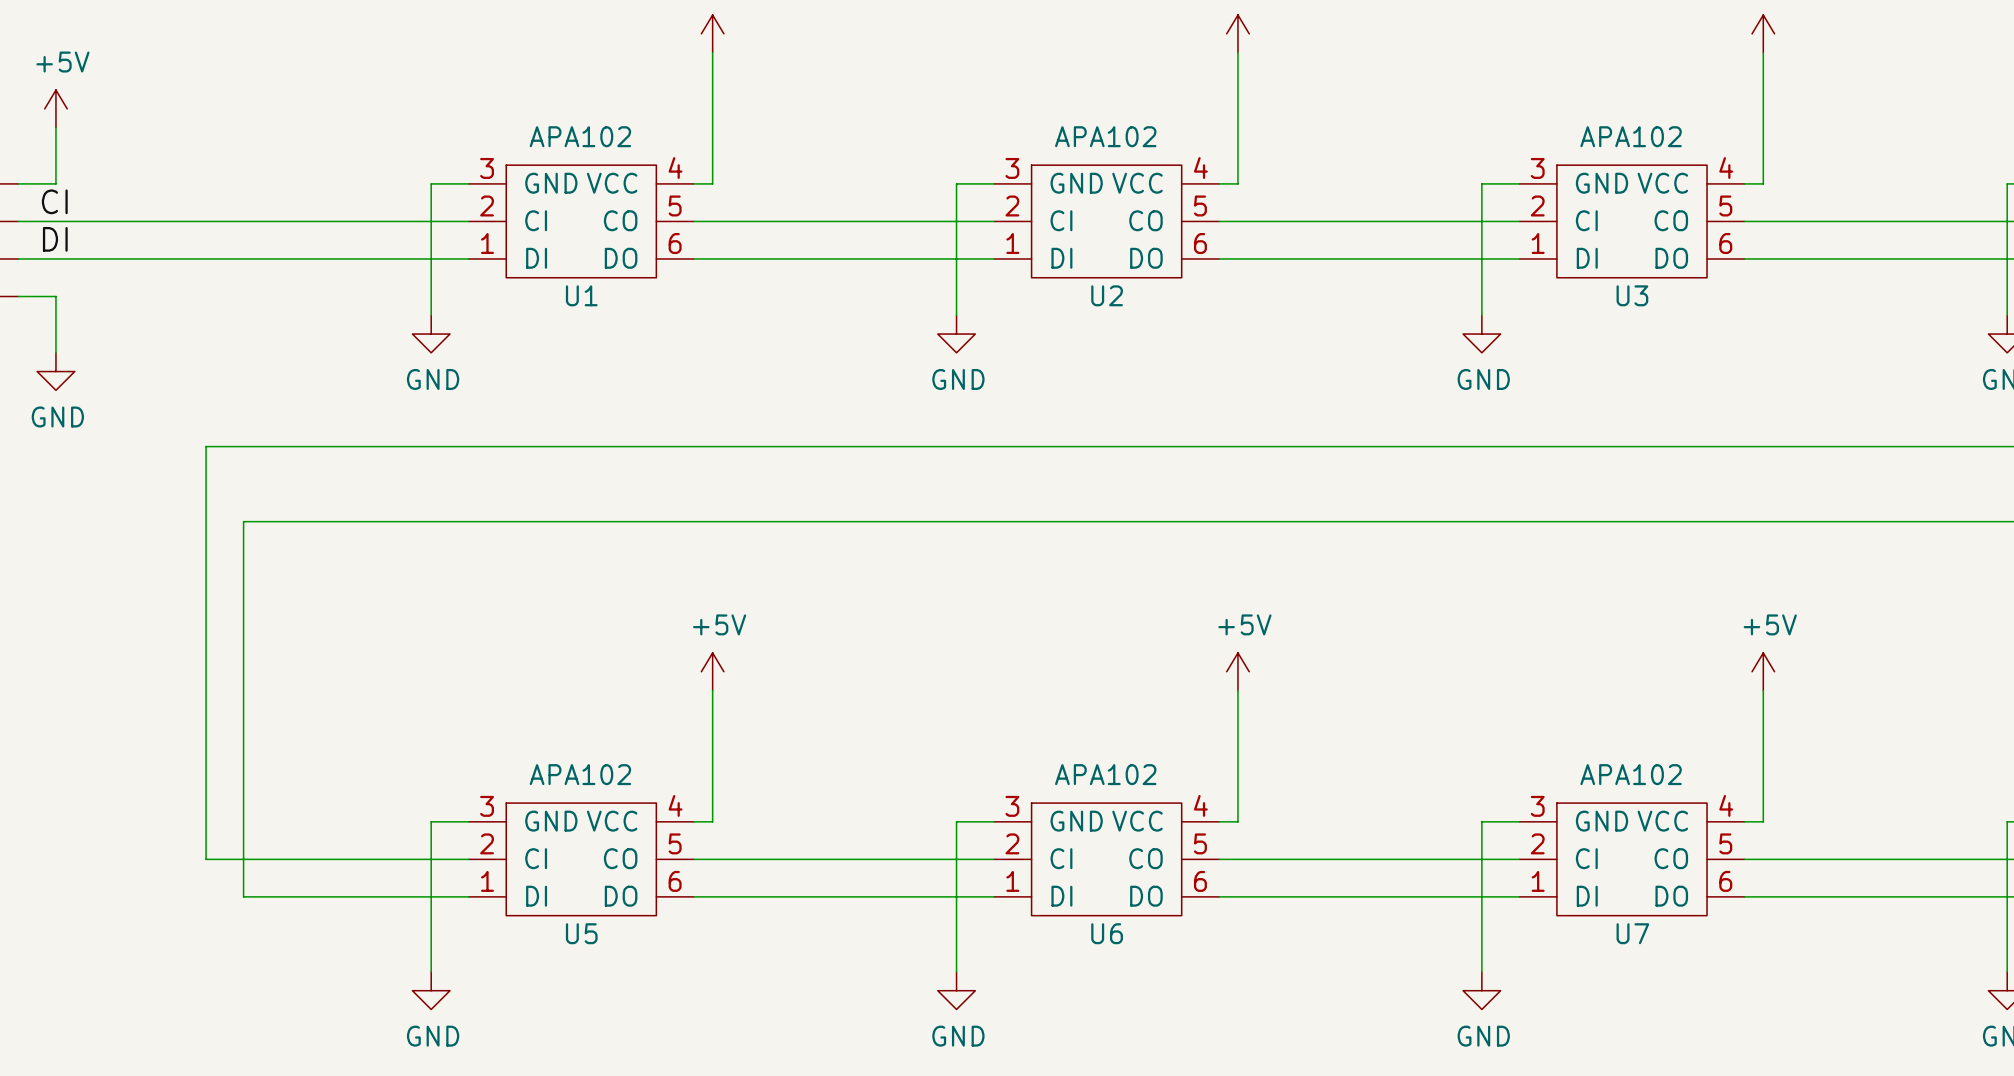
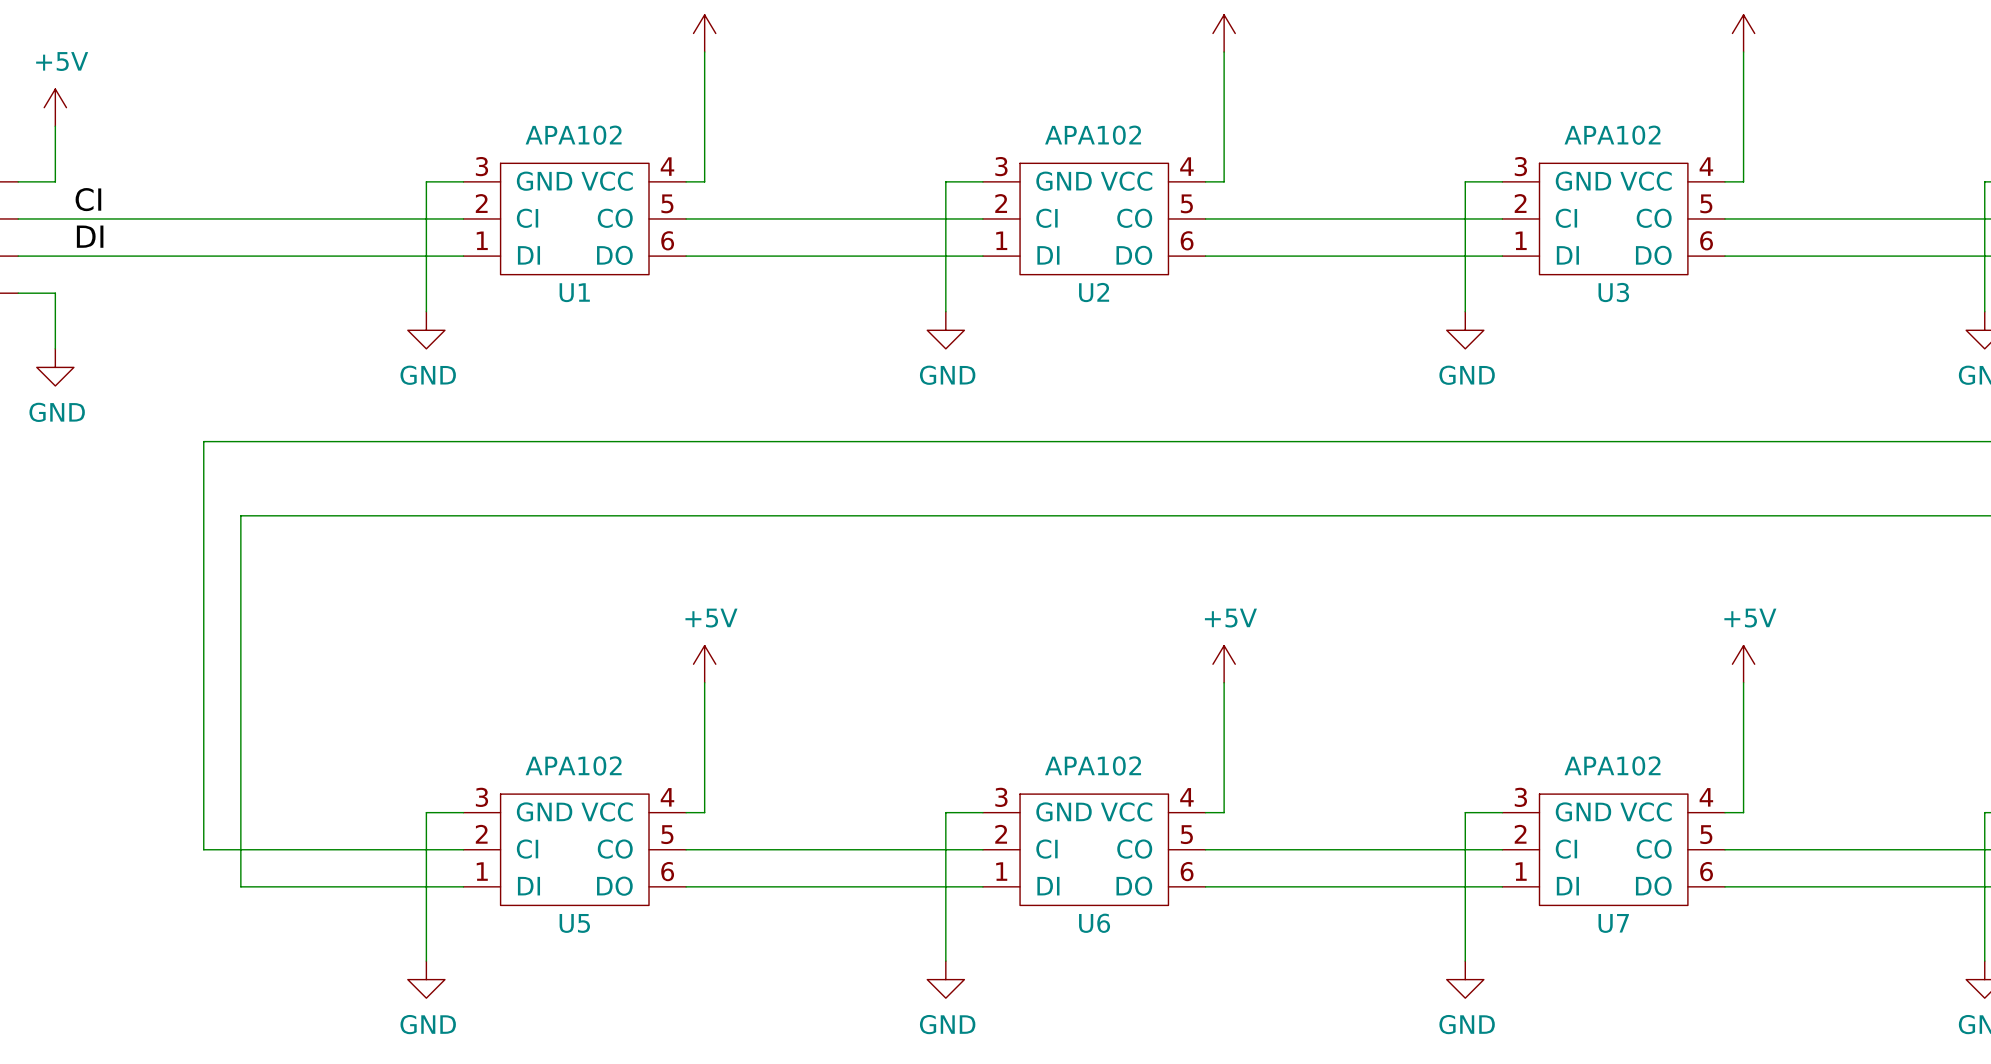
label position: CI (54, 201) -> CI (88, 199)
label position: DI (55, 239) -> DI (90, 236)

